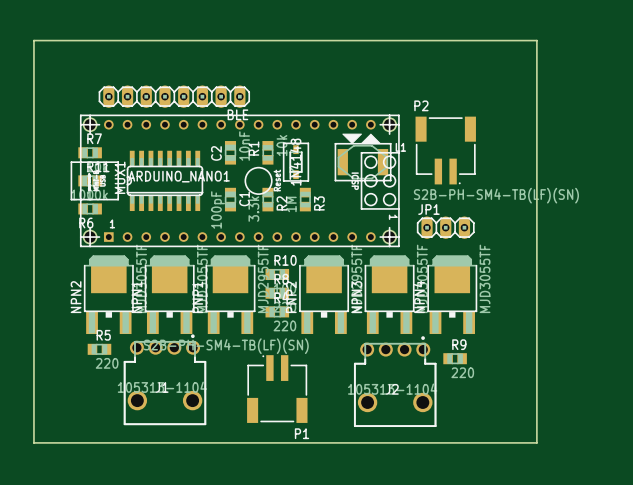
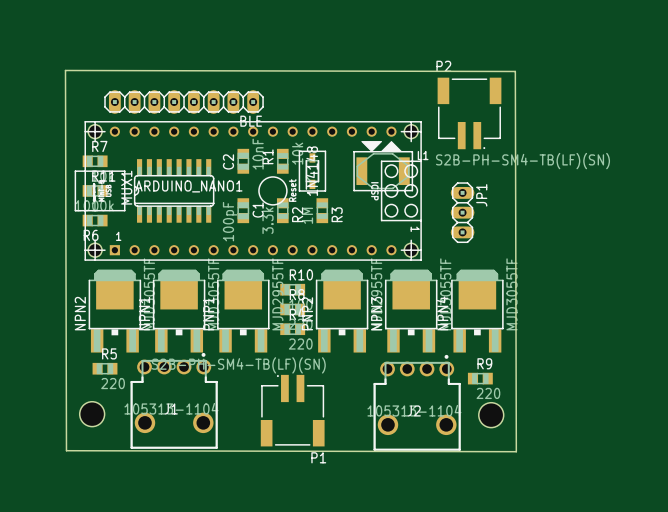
board edge: (33, 40) (536, 40) (536, 442) (33, 442) (33, 40) -> (65, 70) (66, 450) (516, 451) (515, 71) (65, 70)
P2 position: (445, 150) -> (469, 113)
JP1 rotation: 0° (445, 227) -> 90° clockwise (462, 212)
hole: none -> (92, 414)
hole: none -> (491, 415)

